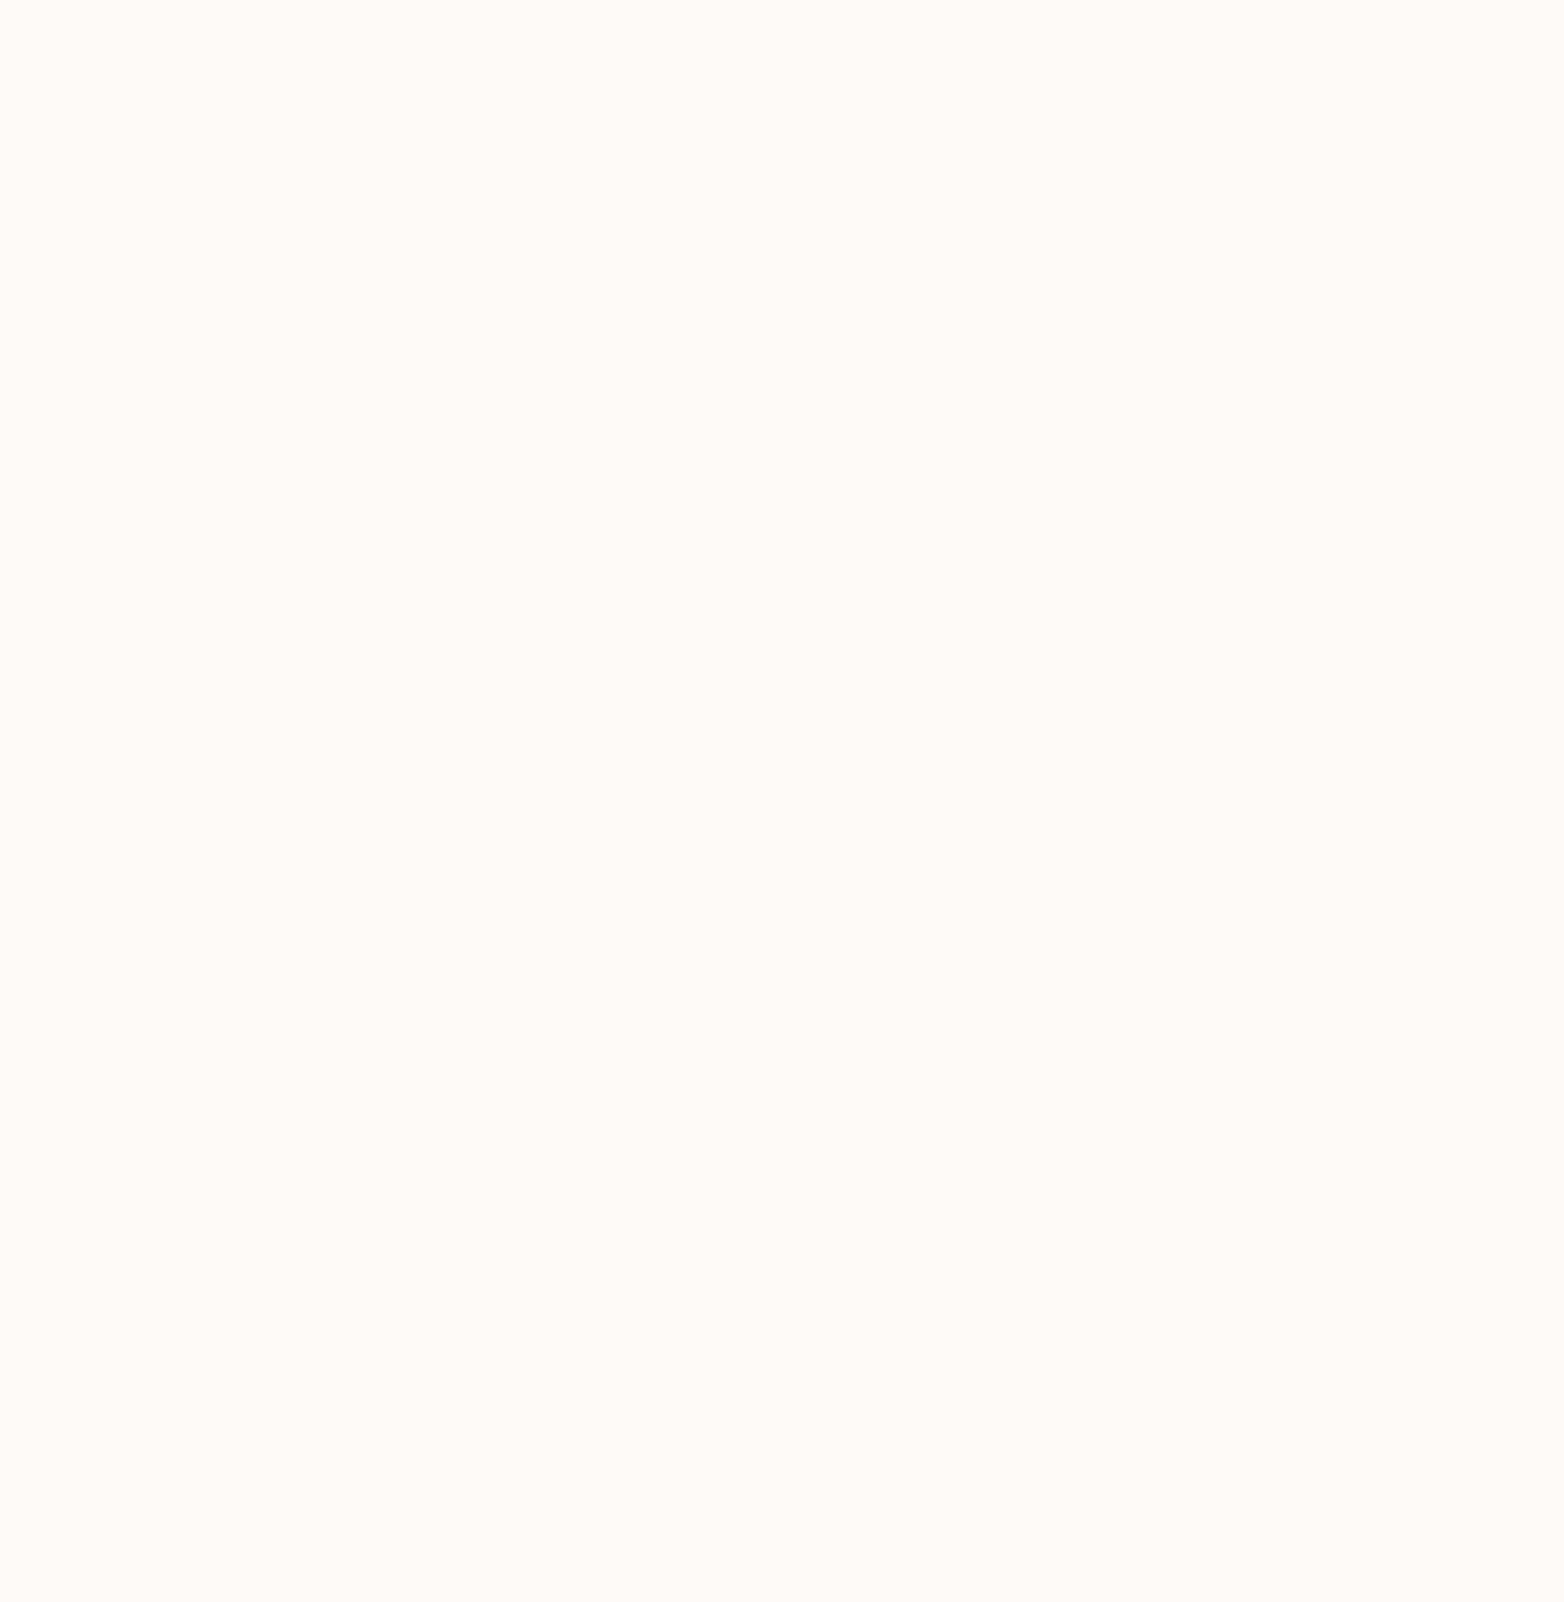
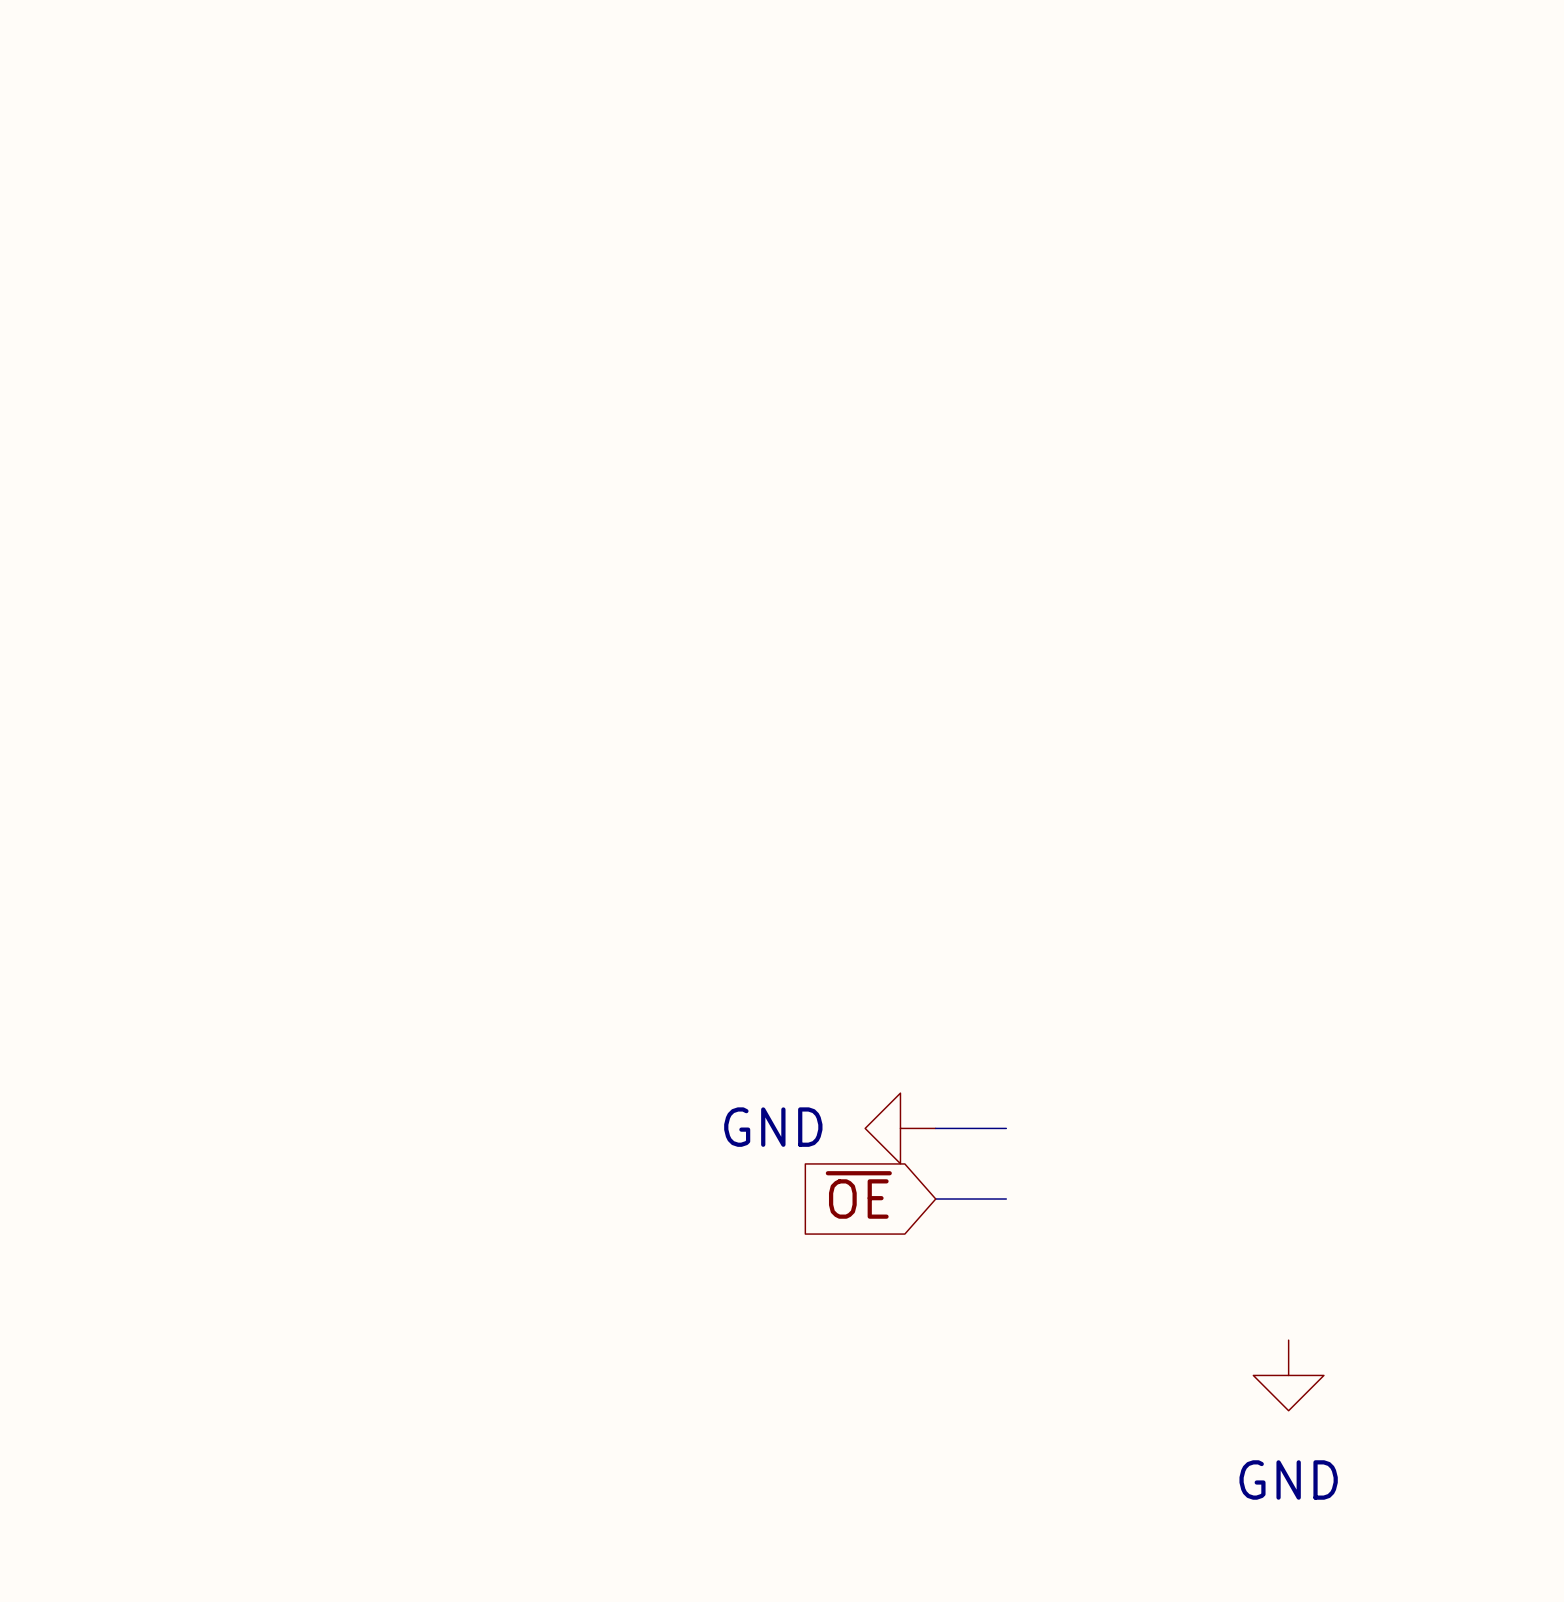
power symbol: none -> GND (900, 1128)
wire: none -> (935, 1128) (1006, 1128)
global label: none -> ~{OE} (858, 1194)
wire: none -> (935, 1199) (1006, 1199)
power symbol: none -> GND (1288, 1375)

